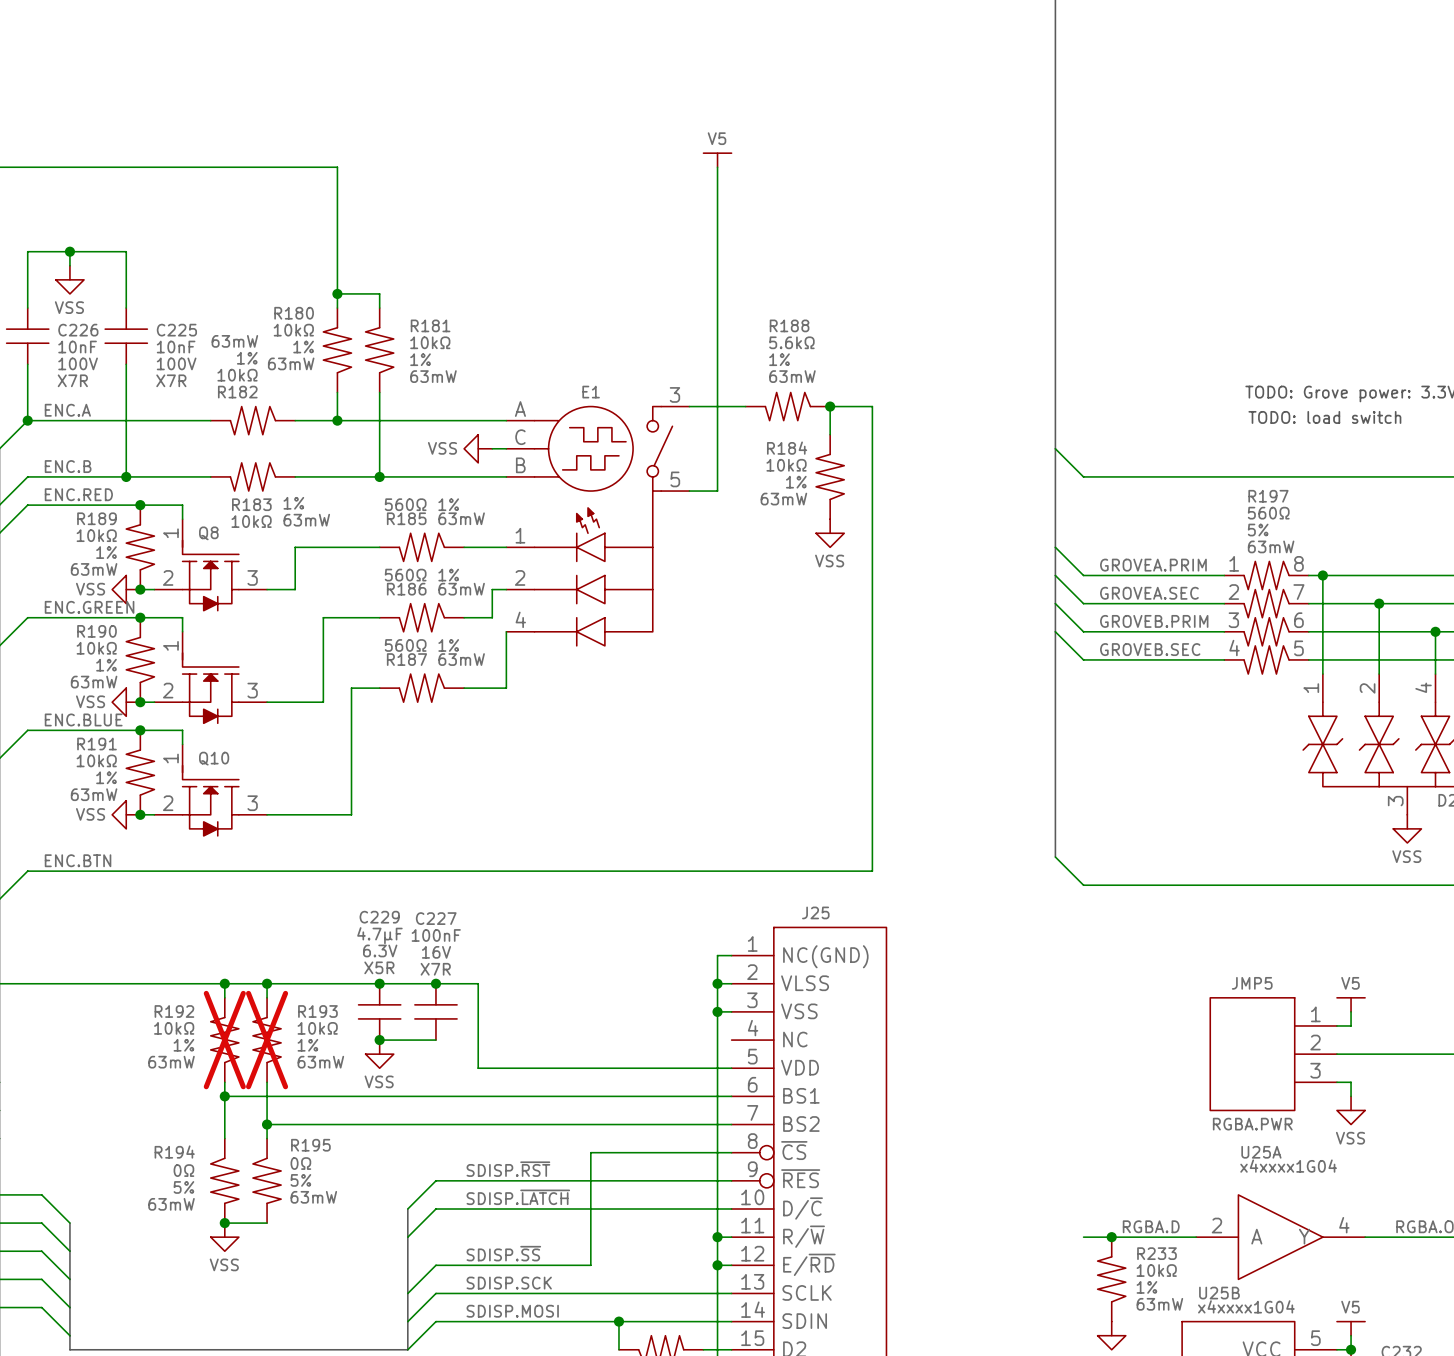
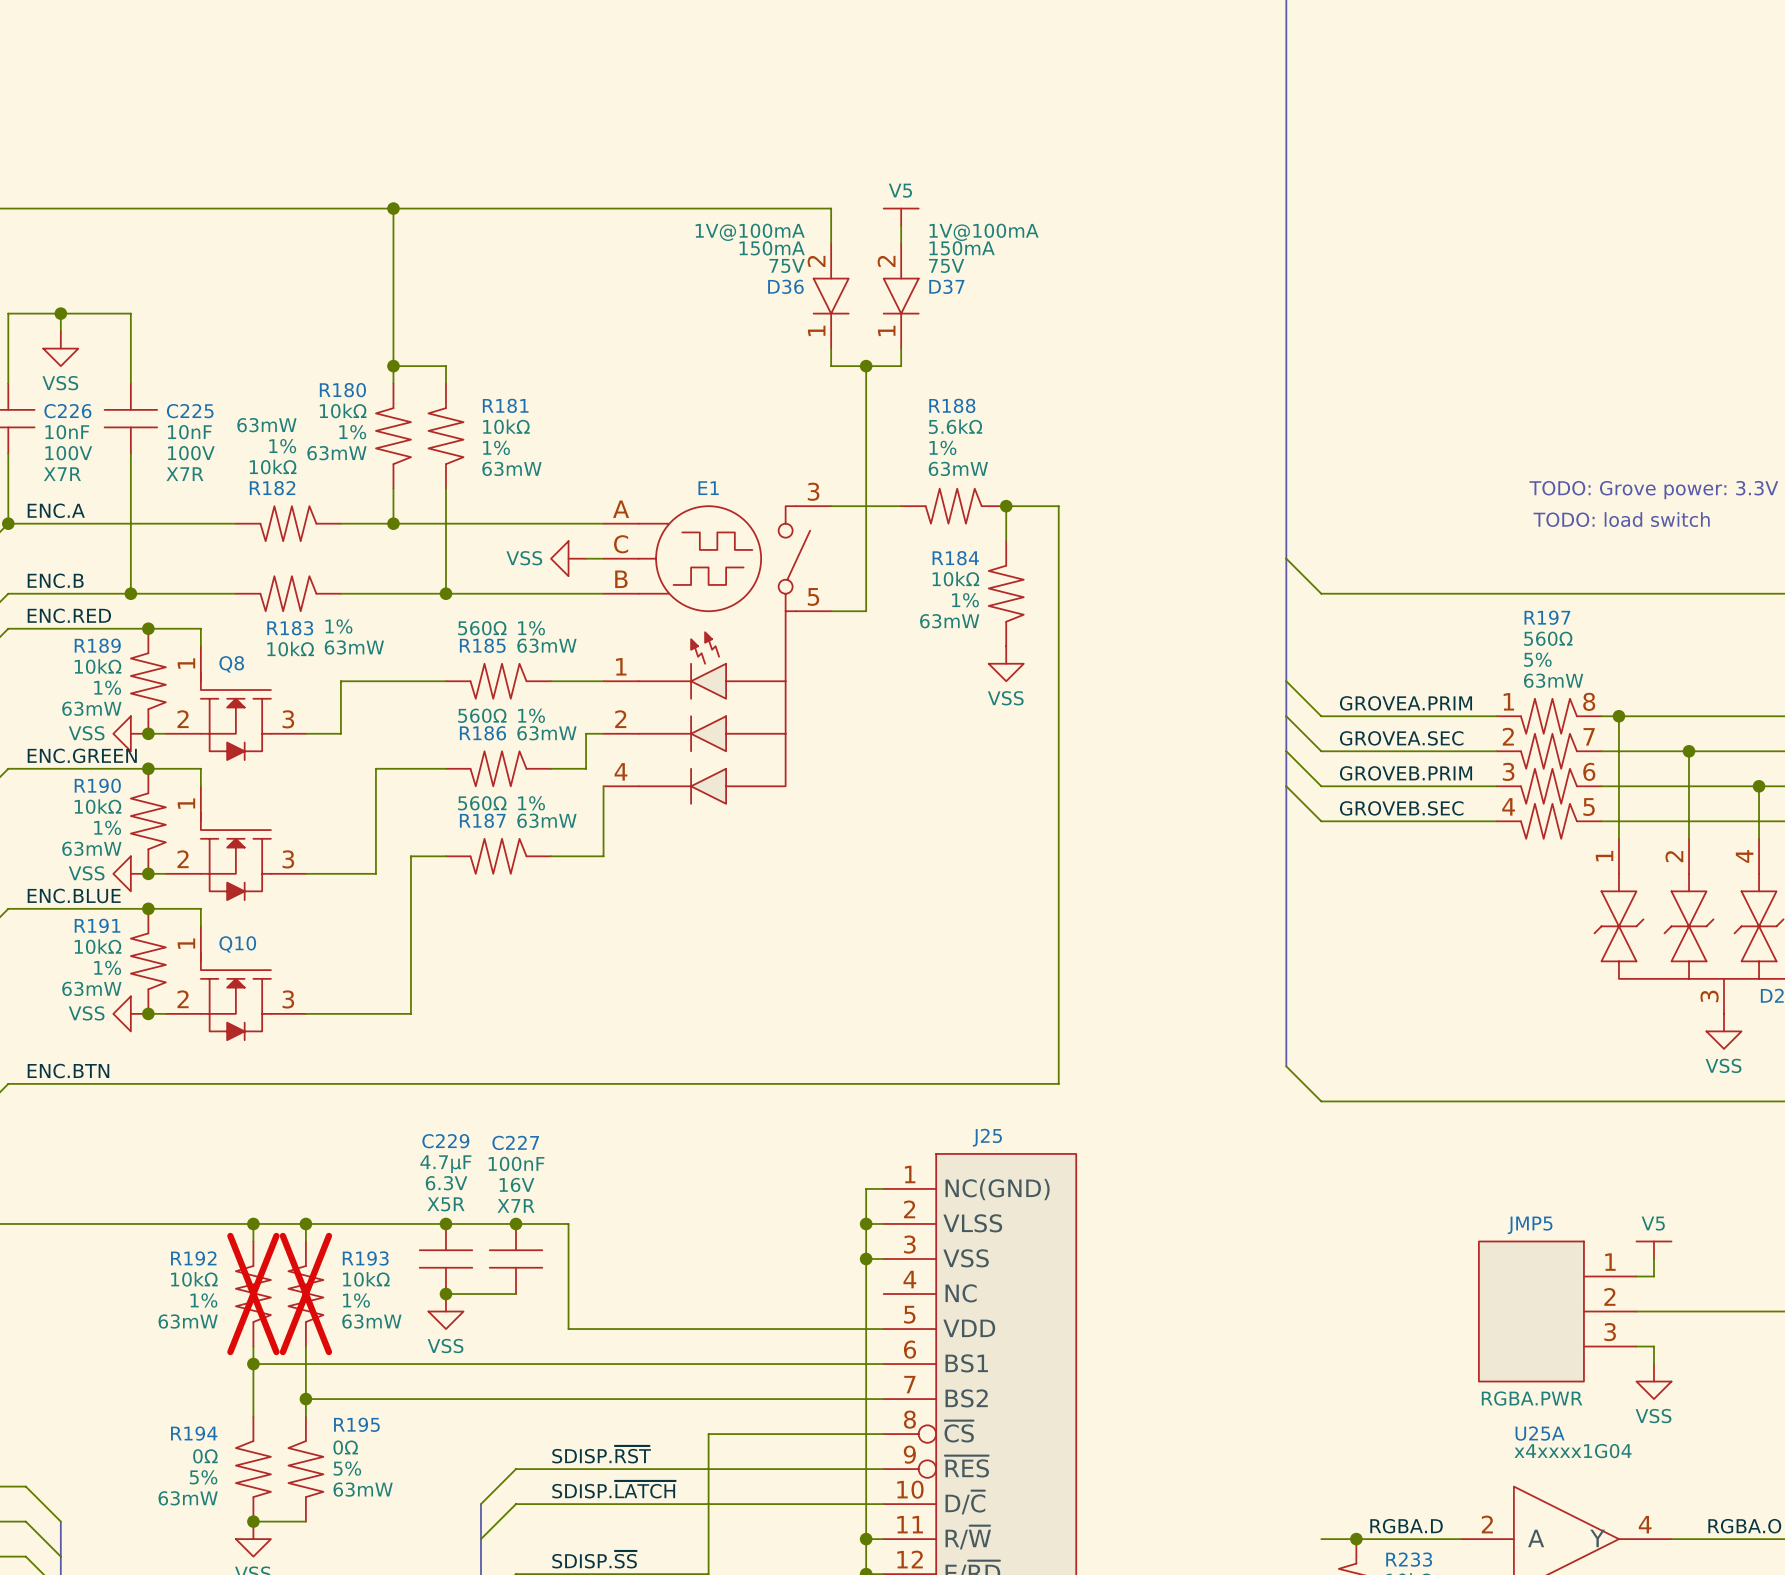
power symbol position: V5 (717, 160) -> V5 (901, 217)
wire: none -> (393, 208) (831, 208) (831, 243)
junction: none -> (393, 208)
wire: (717, 167) (717, 293) -> none
wire: none -> (901, 226) (901, 243)
D36: none -> (831, 296)
D37: none -> (901, 296)
wire: none -> (831, 348) (831, 366) (901, 366) (901, 348)
junction: none -> (866, 366)

